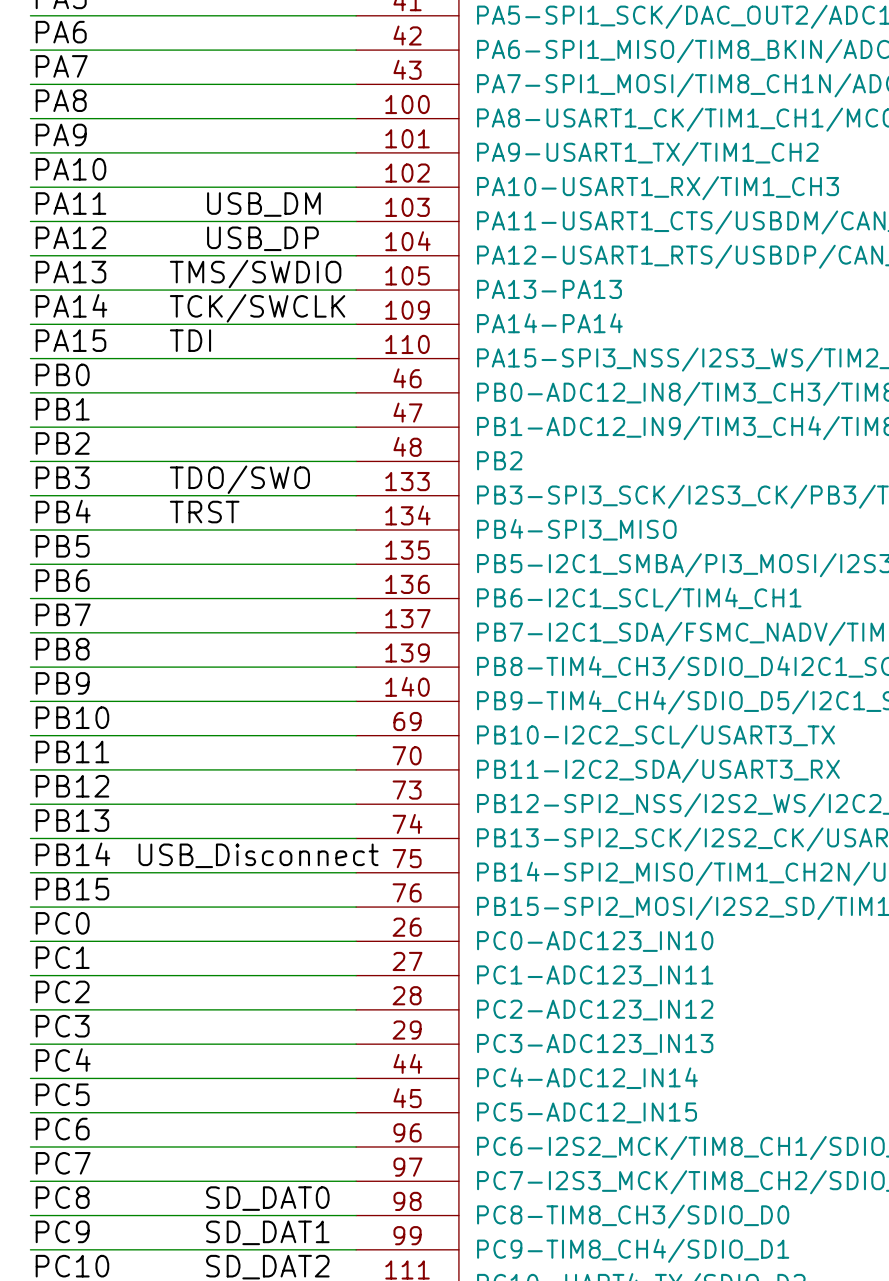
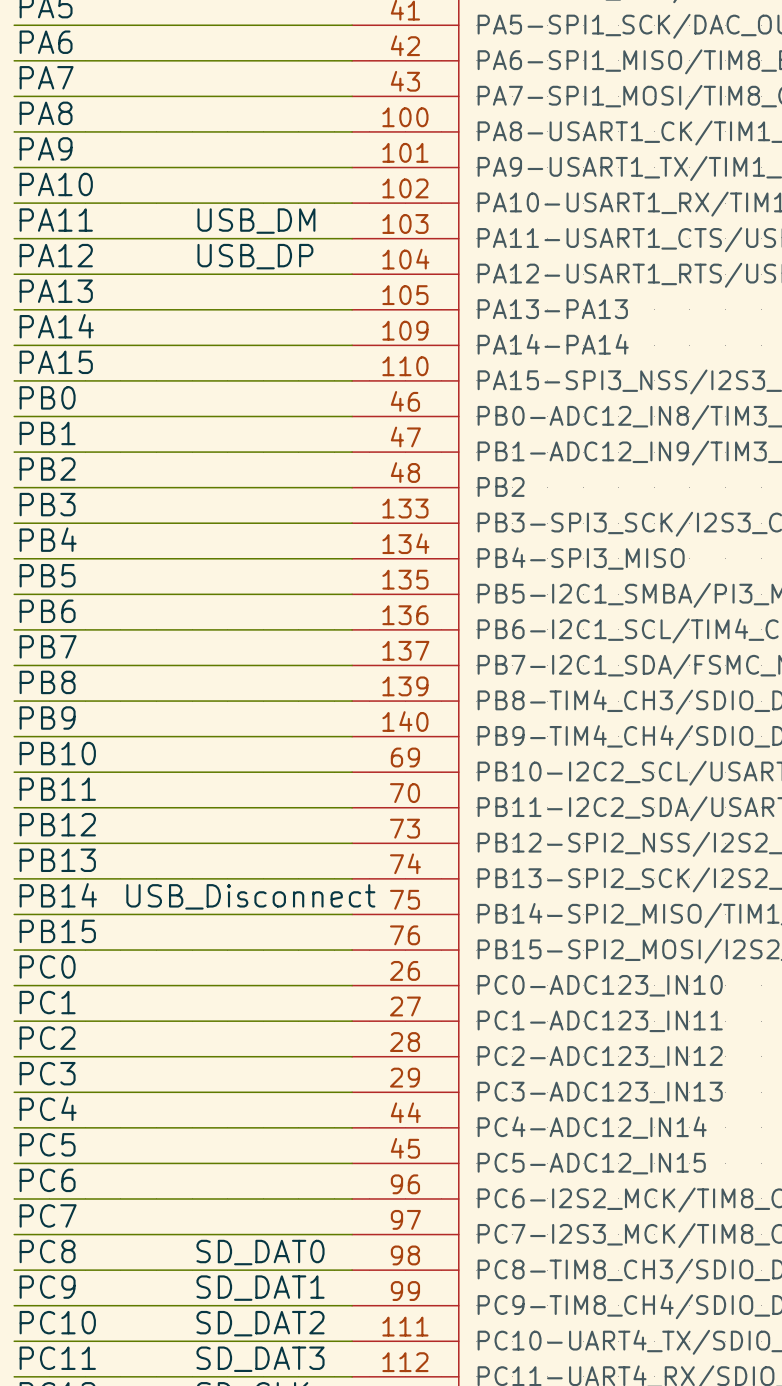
label: TMS/SWDIO (255, 274) -> none
label: TCK/SWCLK (257, 308) -> none
label: TDI (190, 340) -> none
label: TDO/SWO (239, 479) -> none
label: TRST (204, 512) -> none

